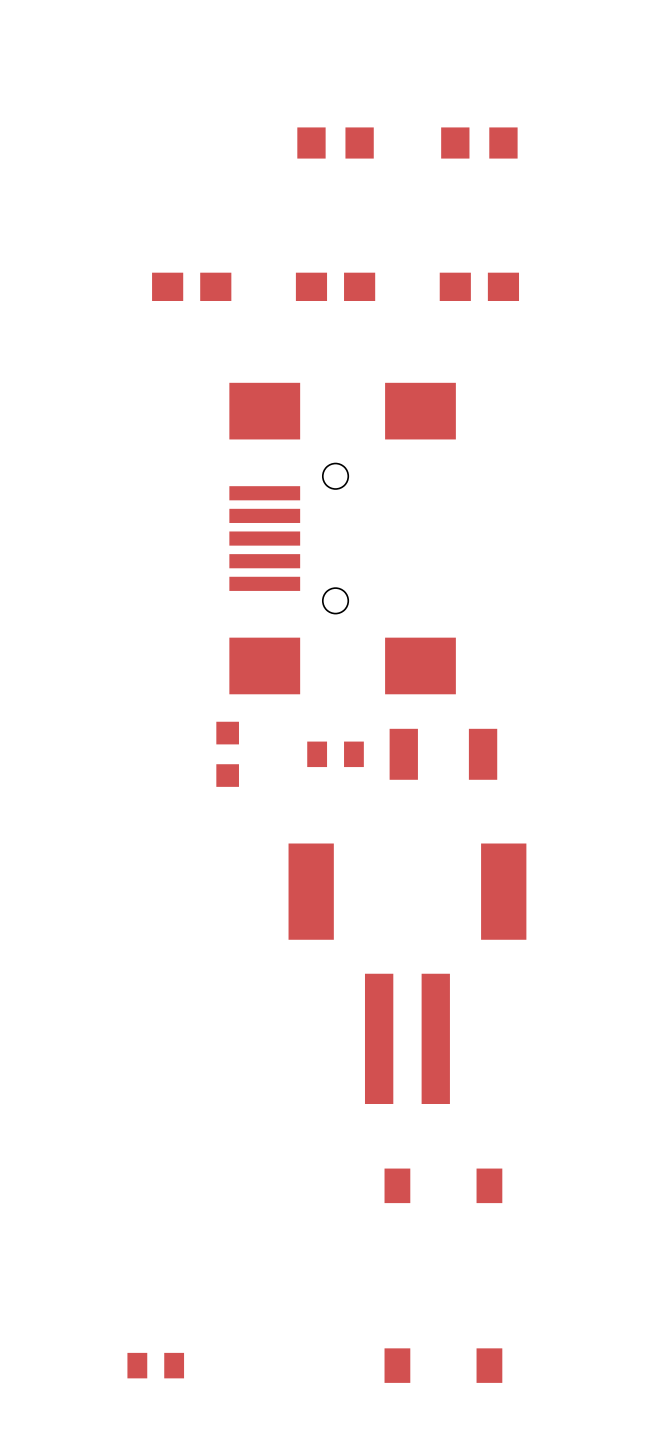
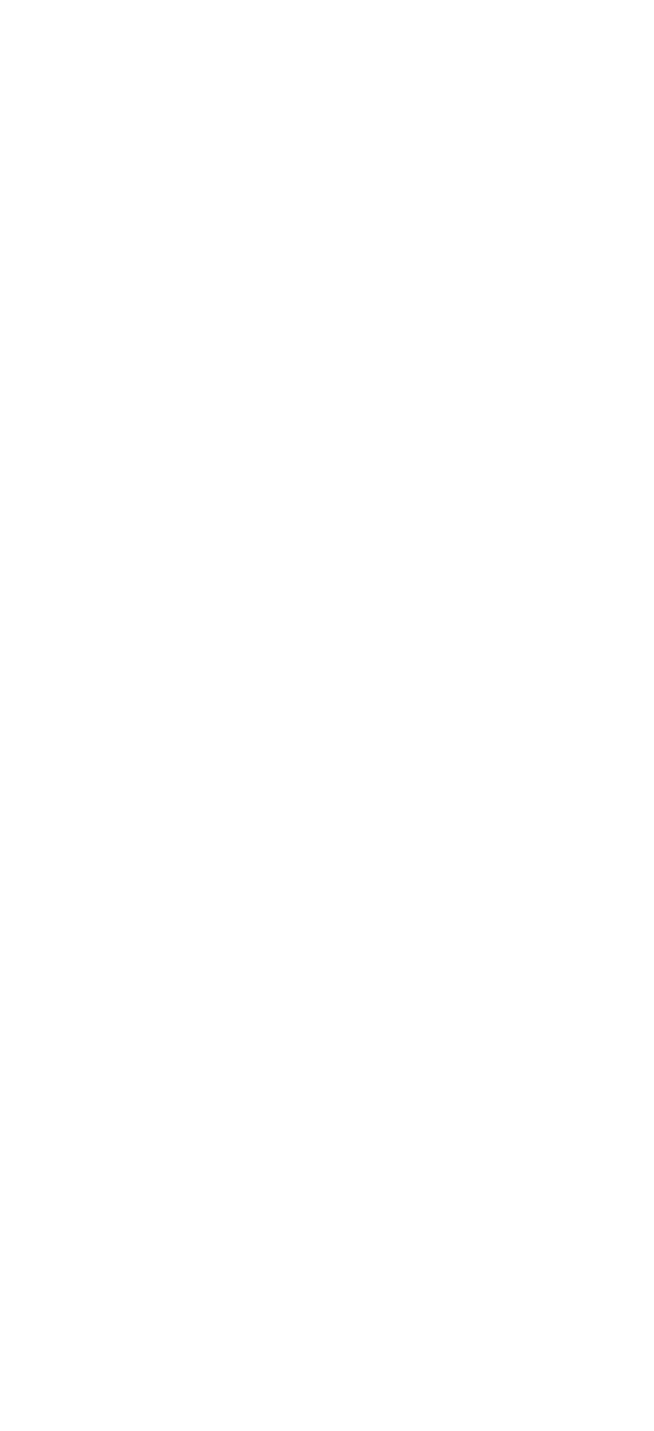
part: (335, 143) -> none
part: (479, 143) -> none
part: (191, 286) -> none
part: (335, 286) -> none
part: (479, 286) -> none
part: (342, 538) -> none
part: (227, 754) -> none
part: (335, 754) -> none
part: (443, 754) -> none
part: (407, 973) -> none
part: (443, 1185) -> none
part: (155, 1365) -> none
part: (443, 1365) -> none

